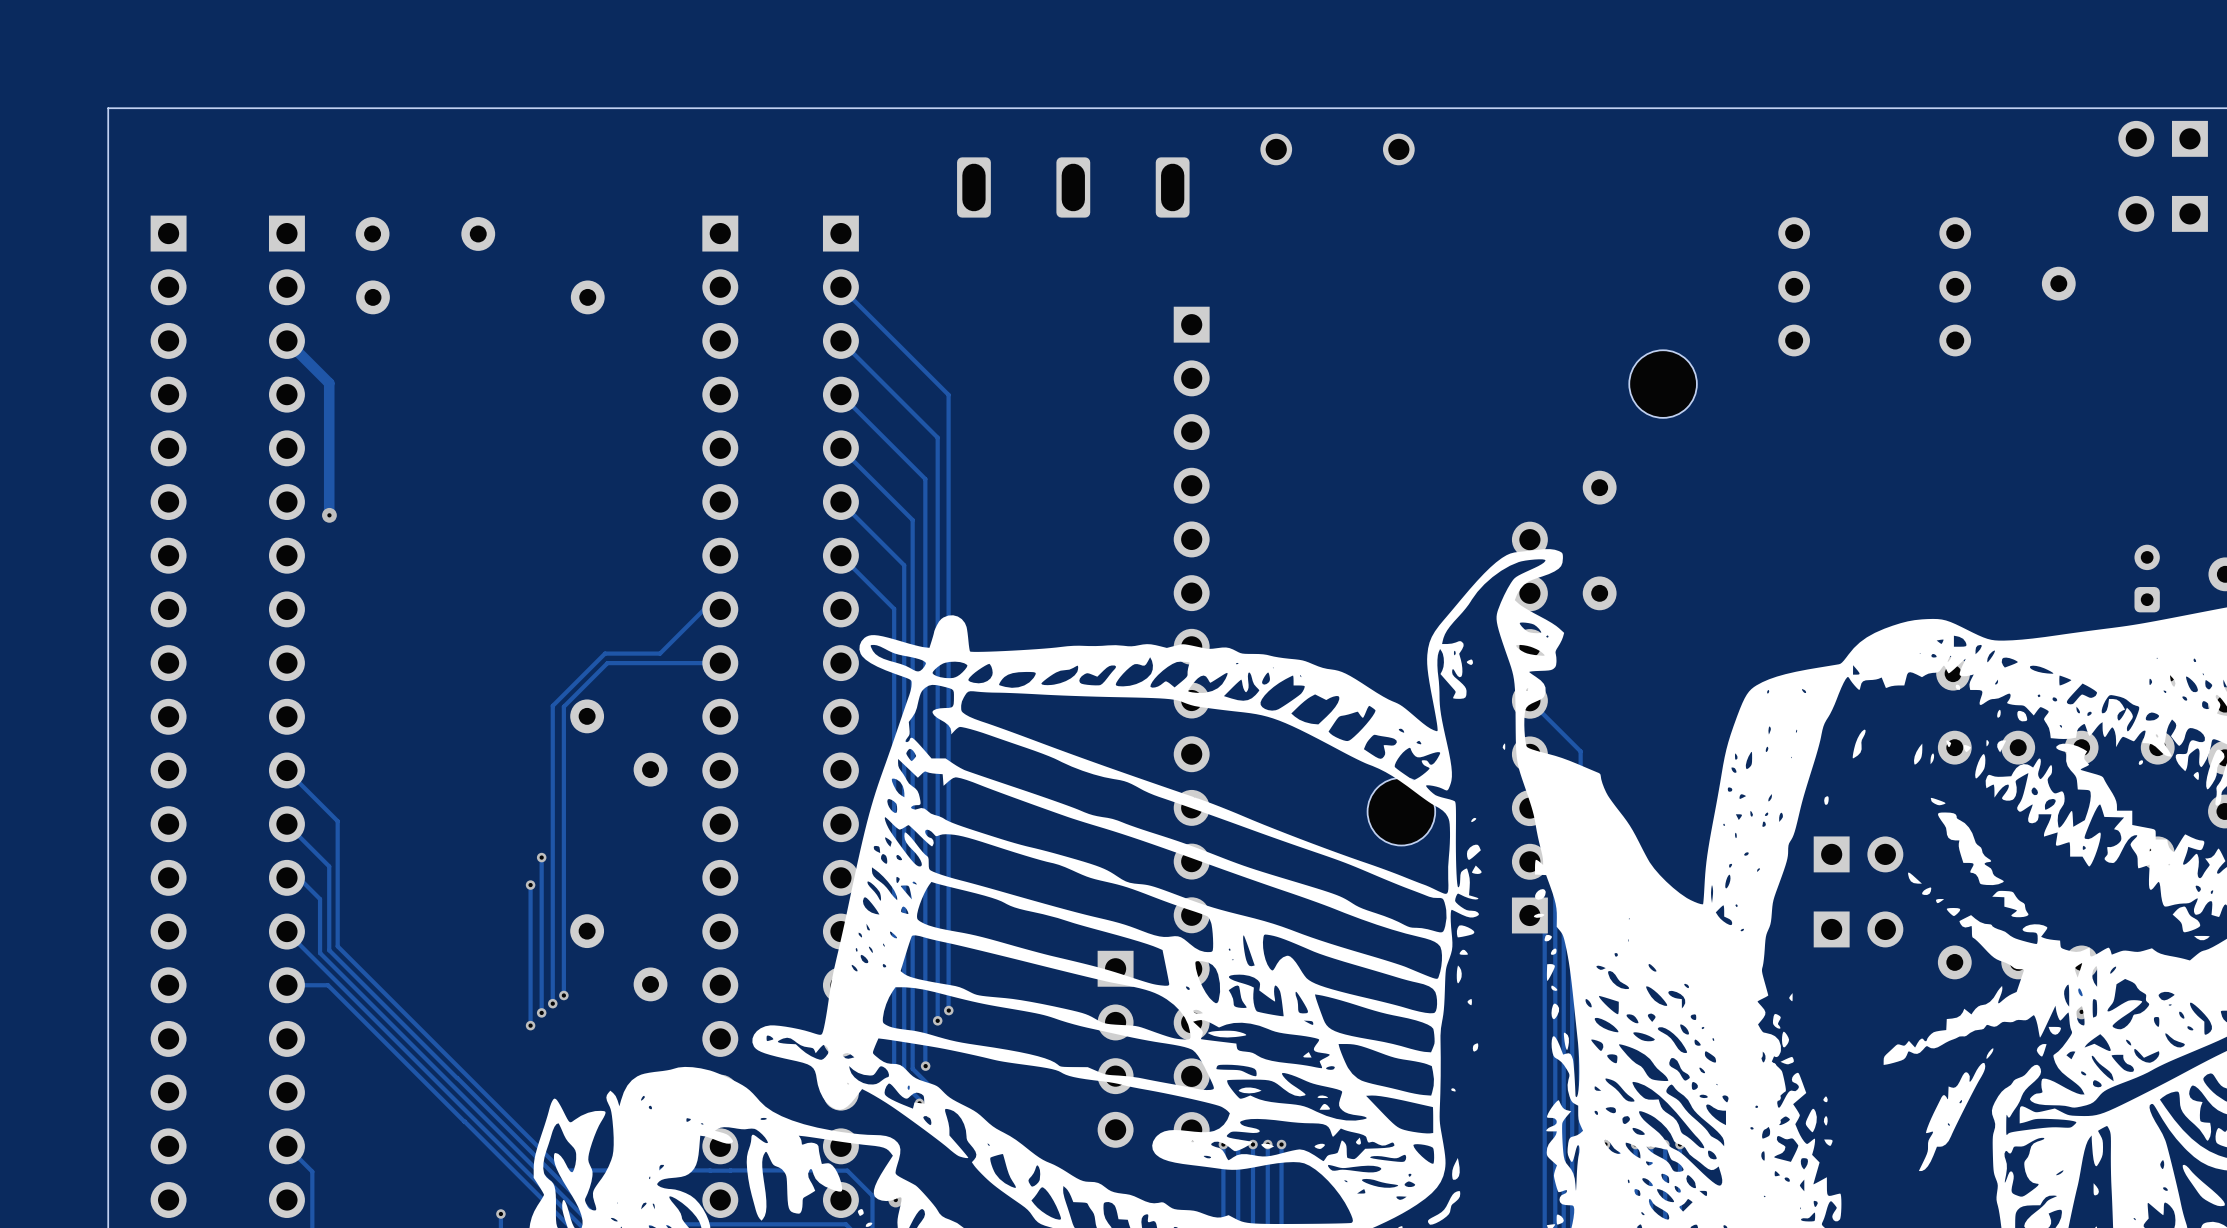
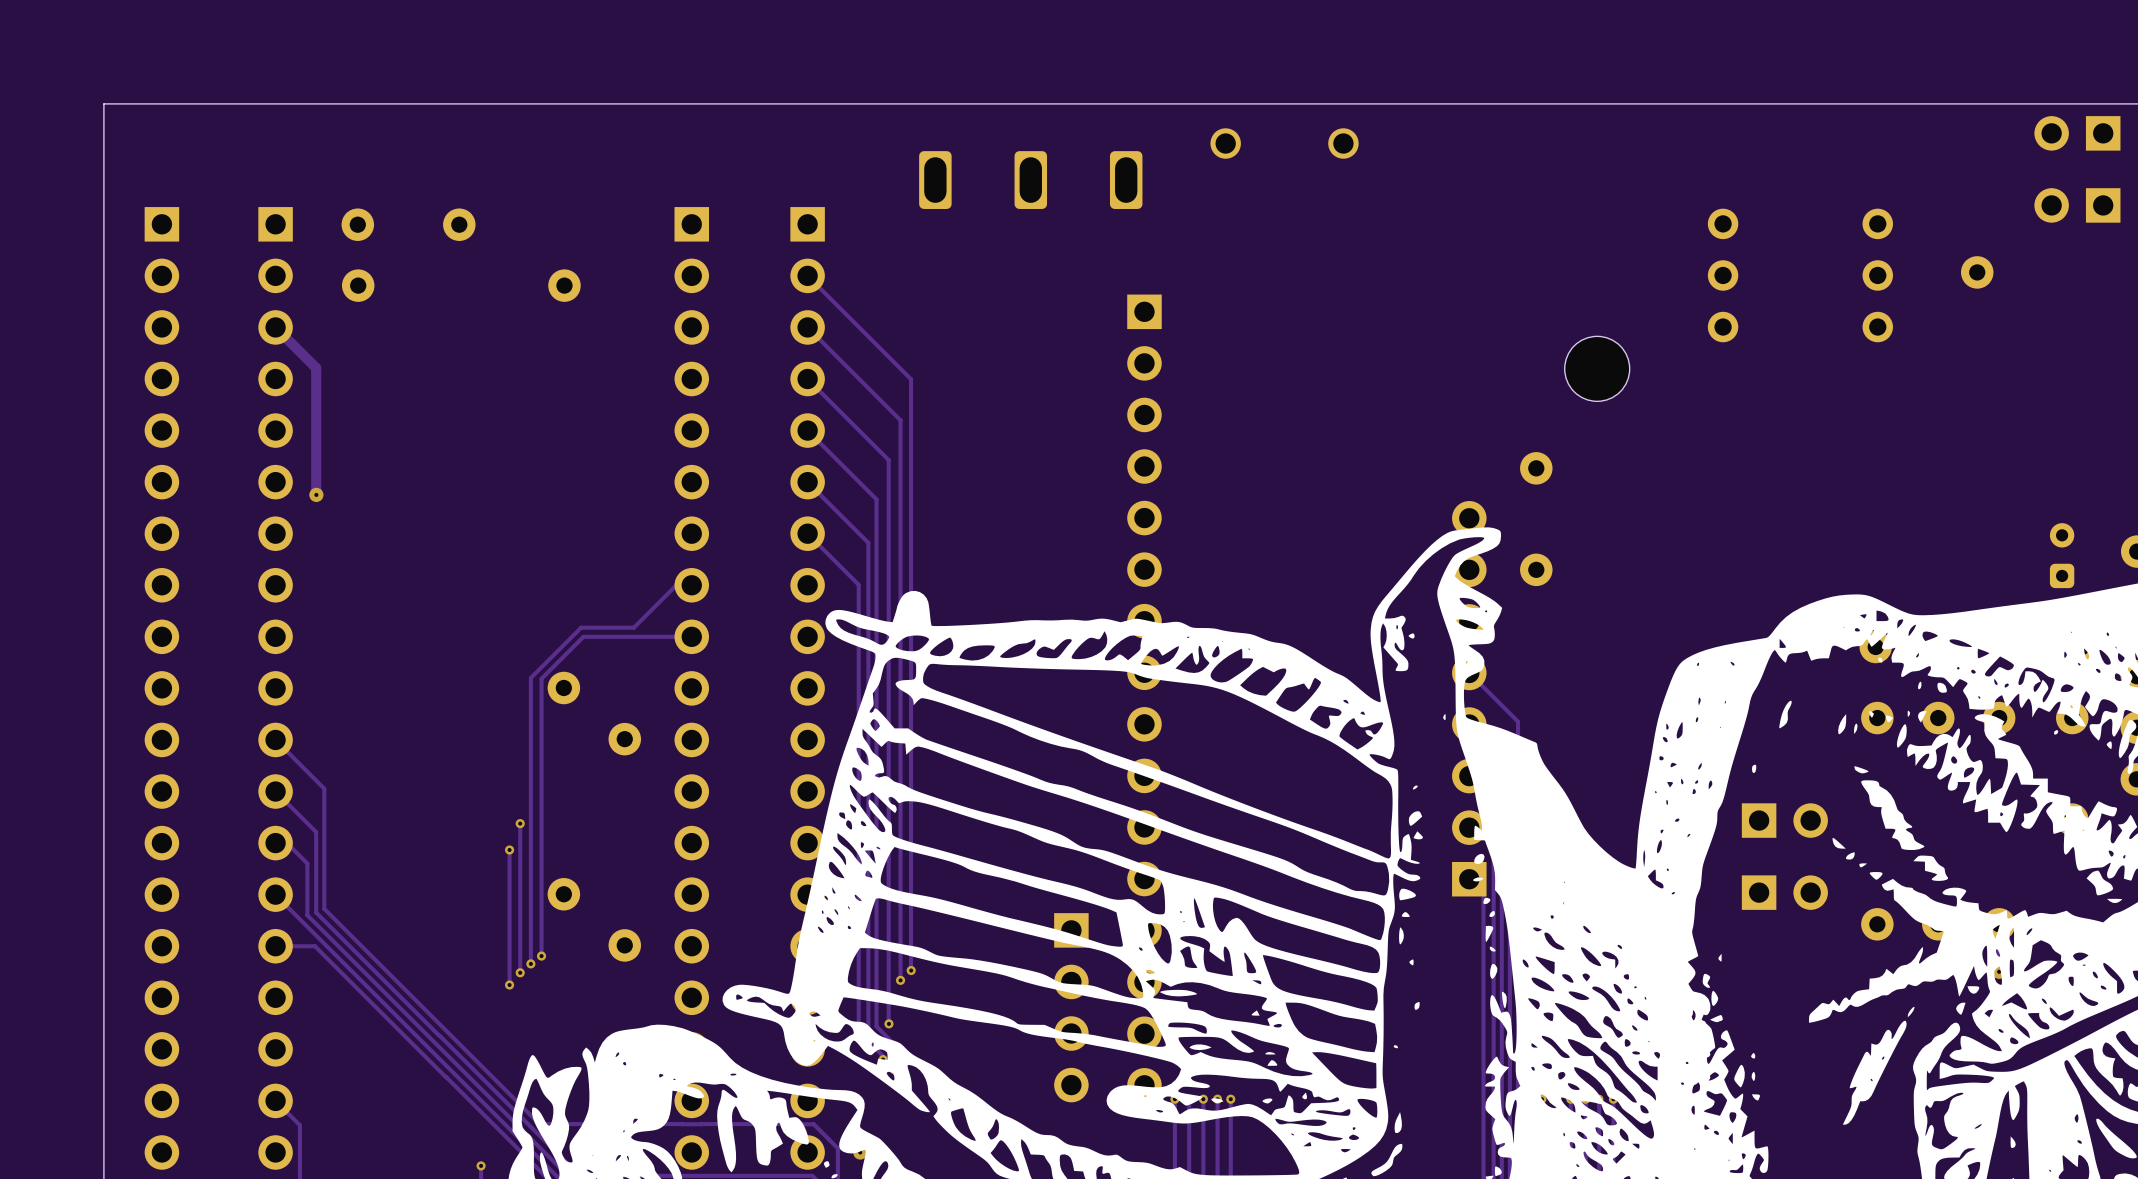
part: (1401, 811) -> none

